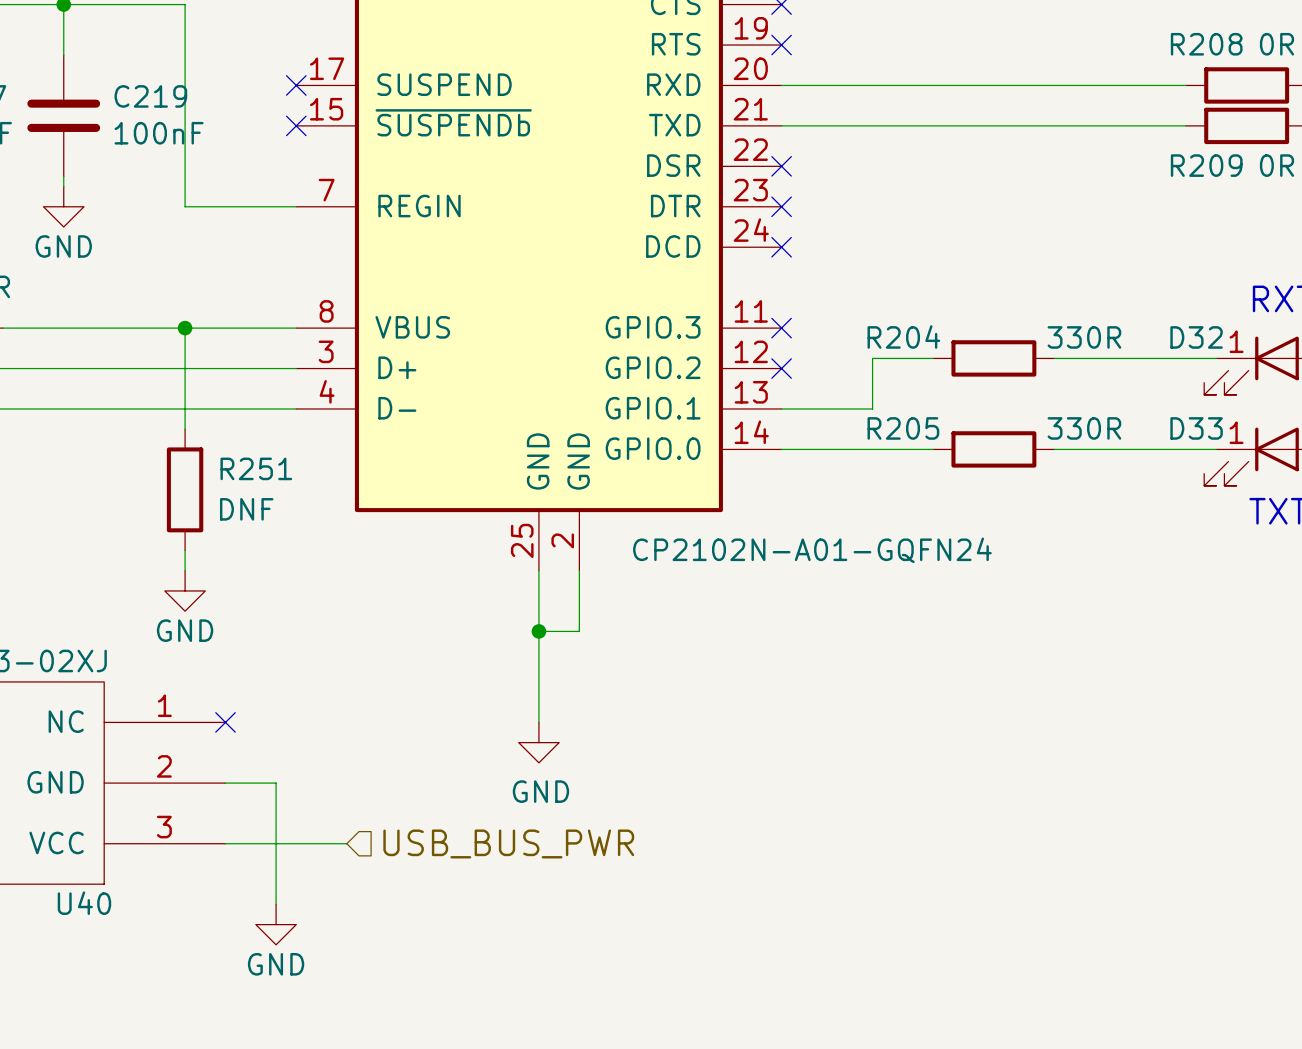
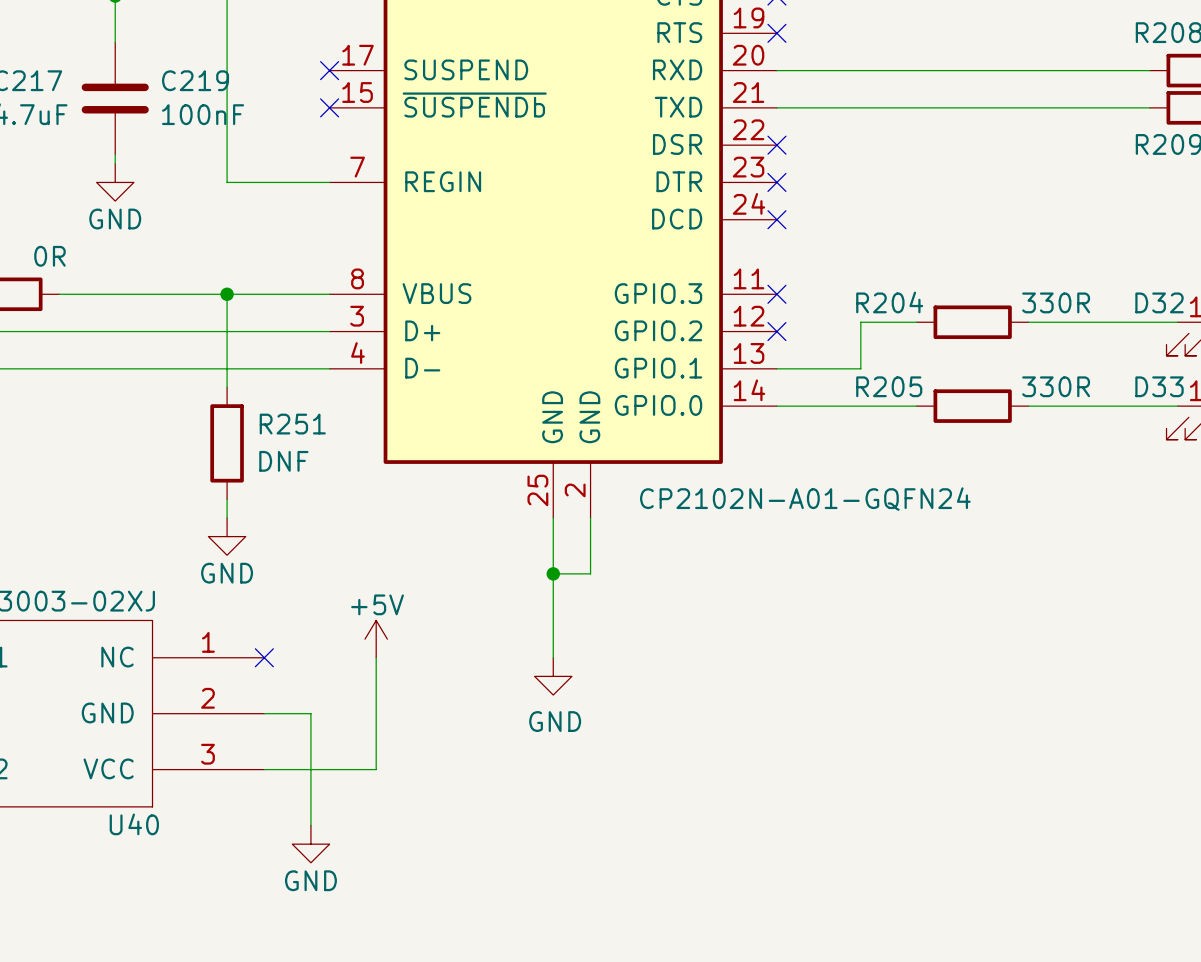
power symbol: none -> +5V (376, 639)
wire: none -> (376, 657) (376, 769)
hierarchical label: USB_BUS_PWR (508, 843) -> none

